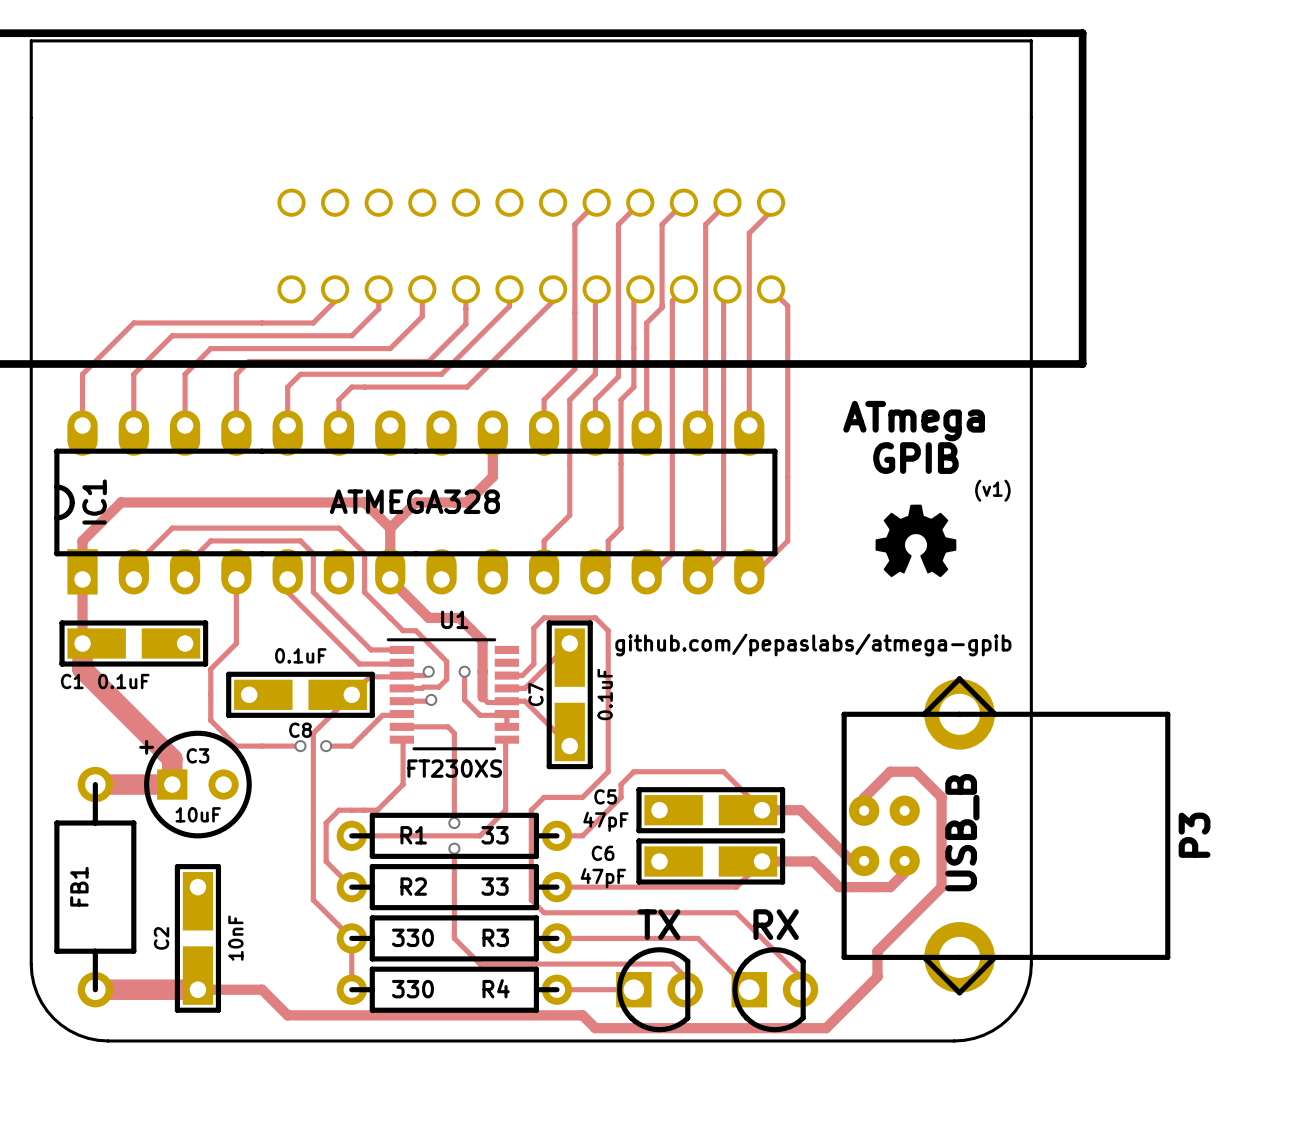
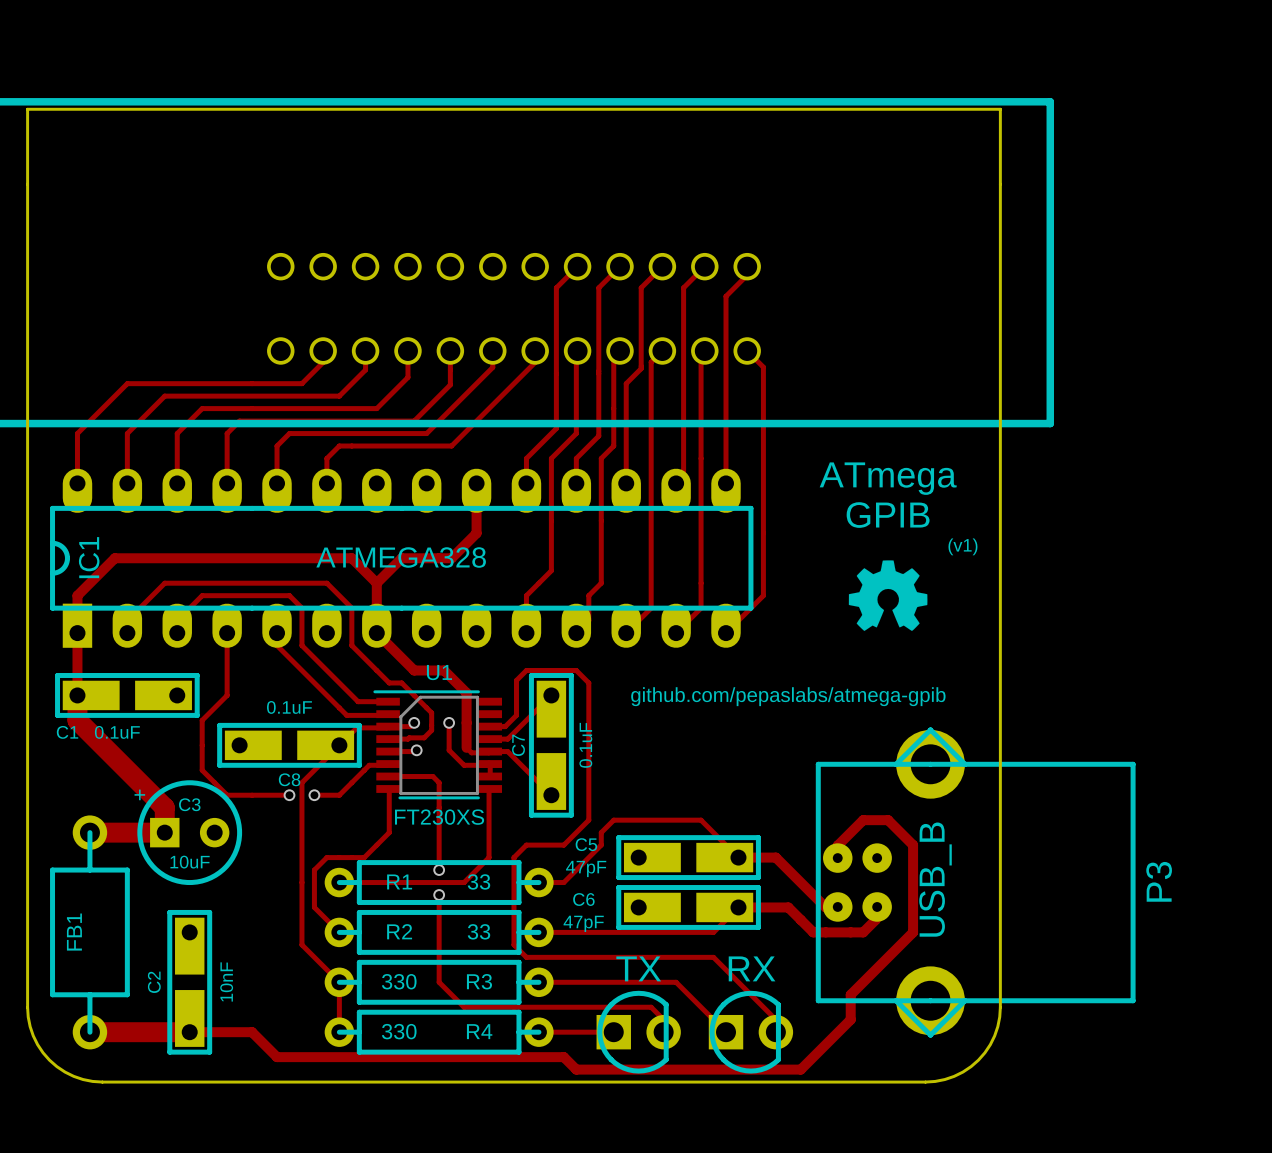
U1 footprint: [386, 638, 519, 751] -> [373, 690, 503, 800]

